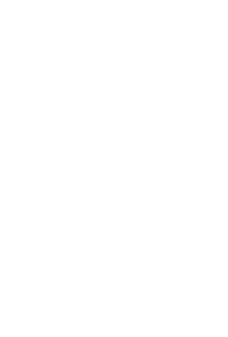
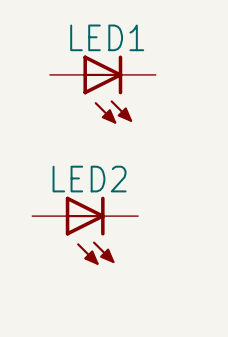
LED1: none -> (102, 89)
LED2: none -> (85, 230)

